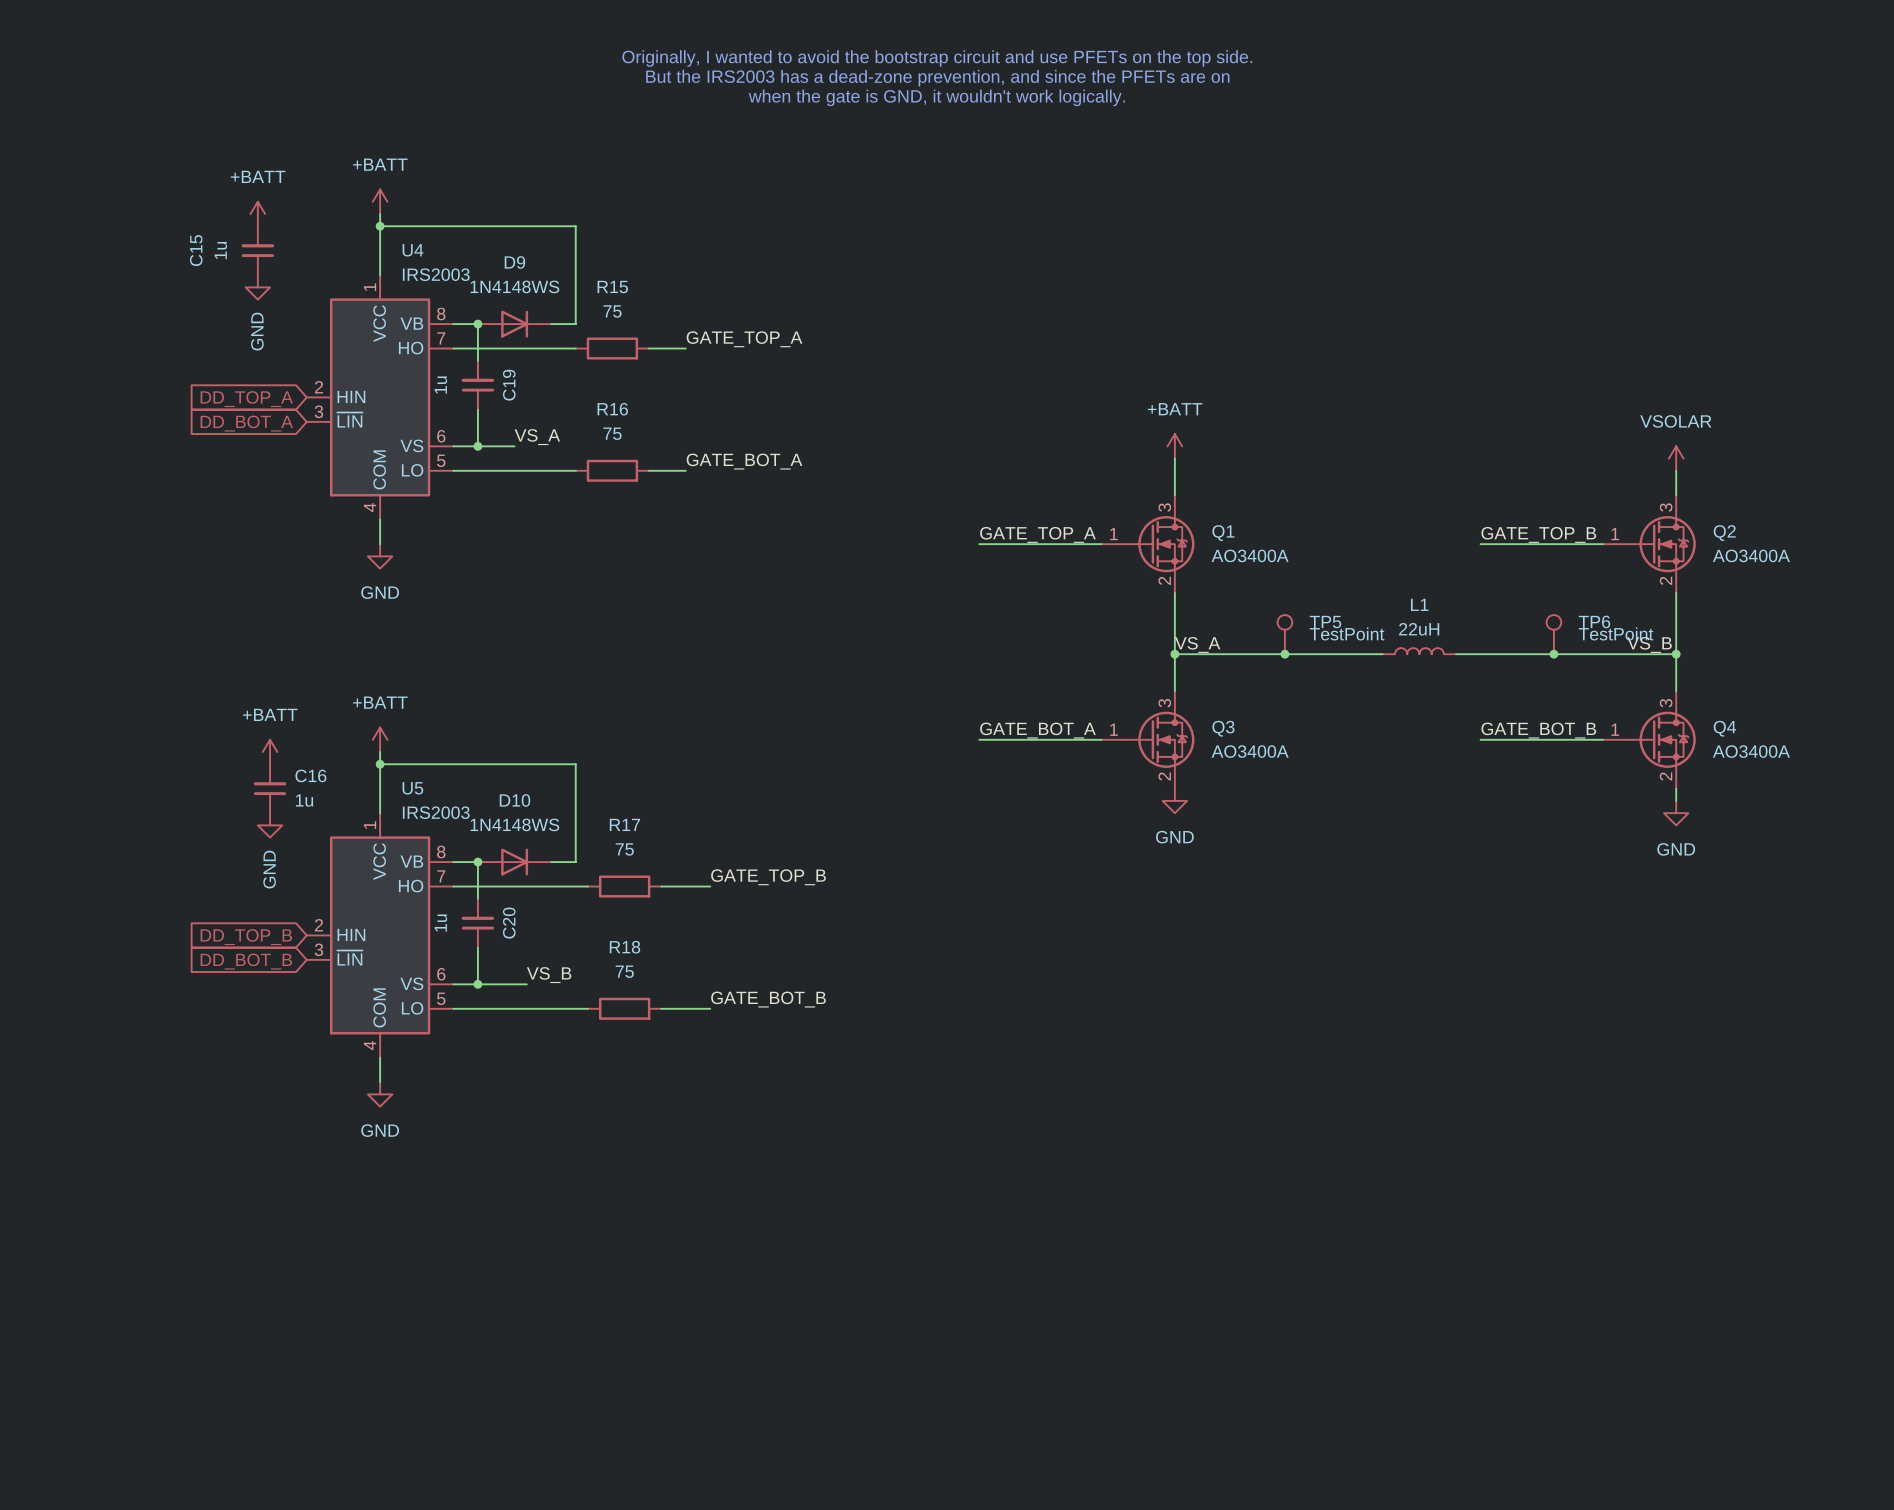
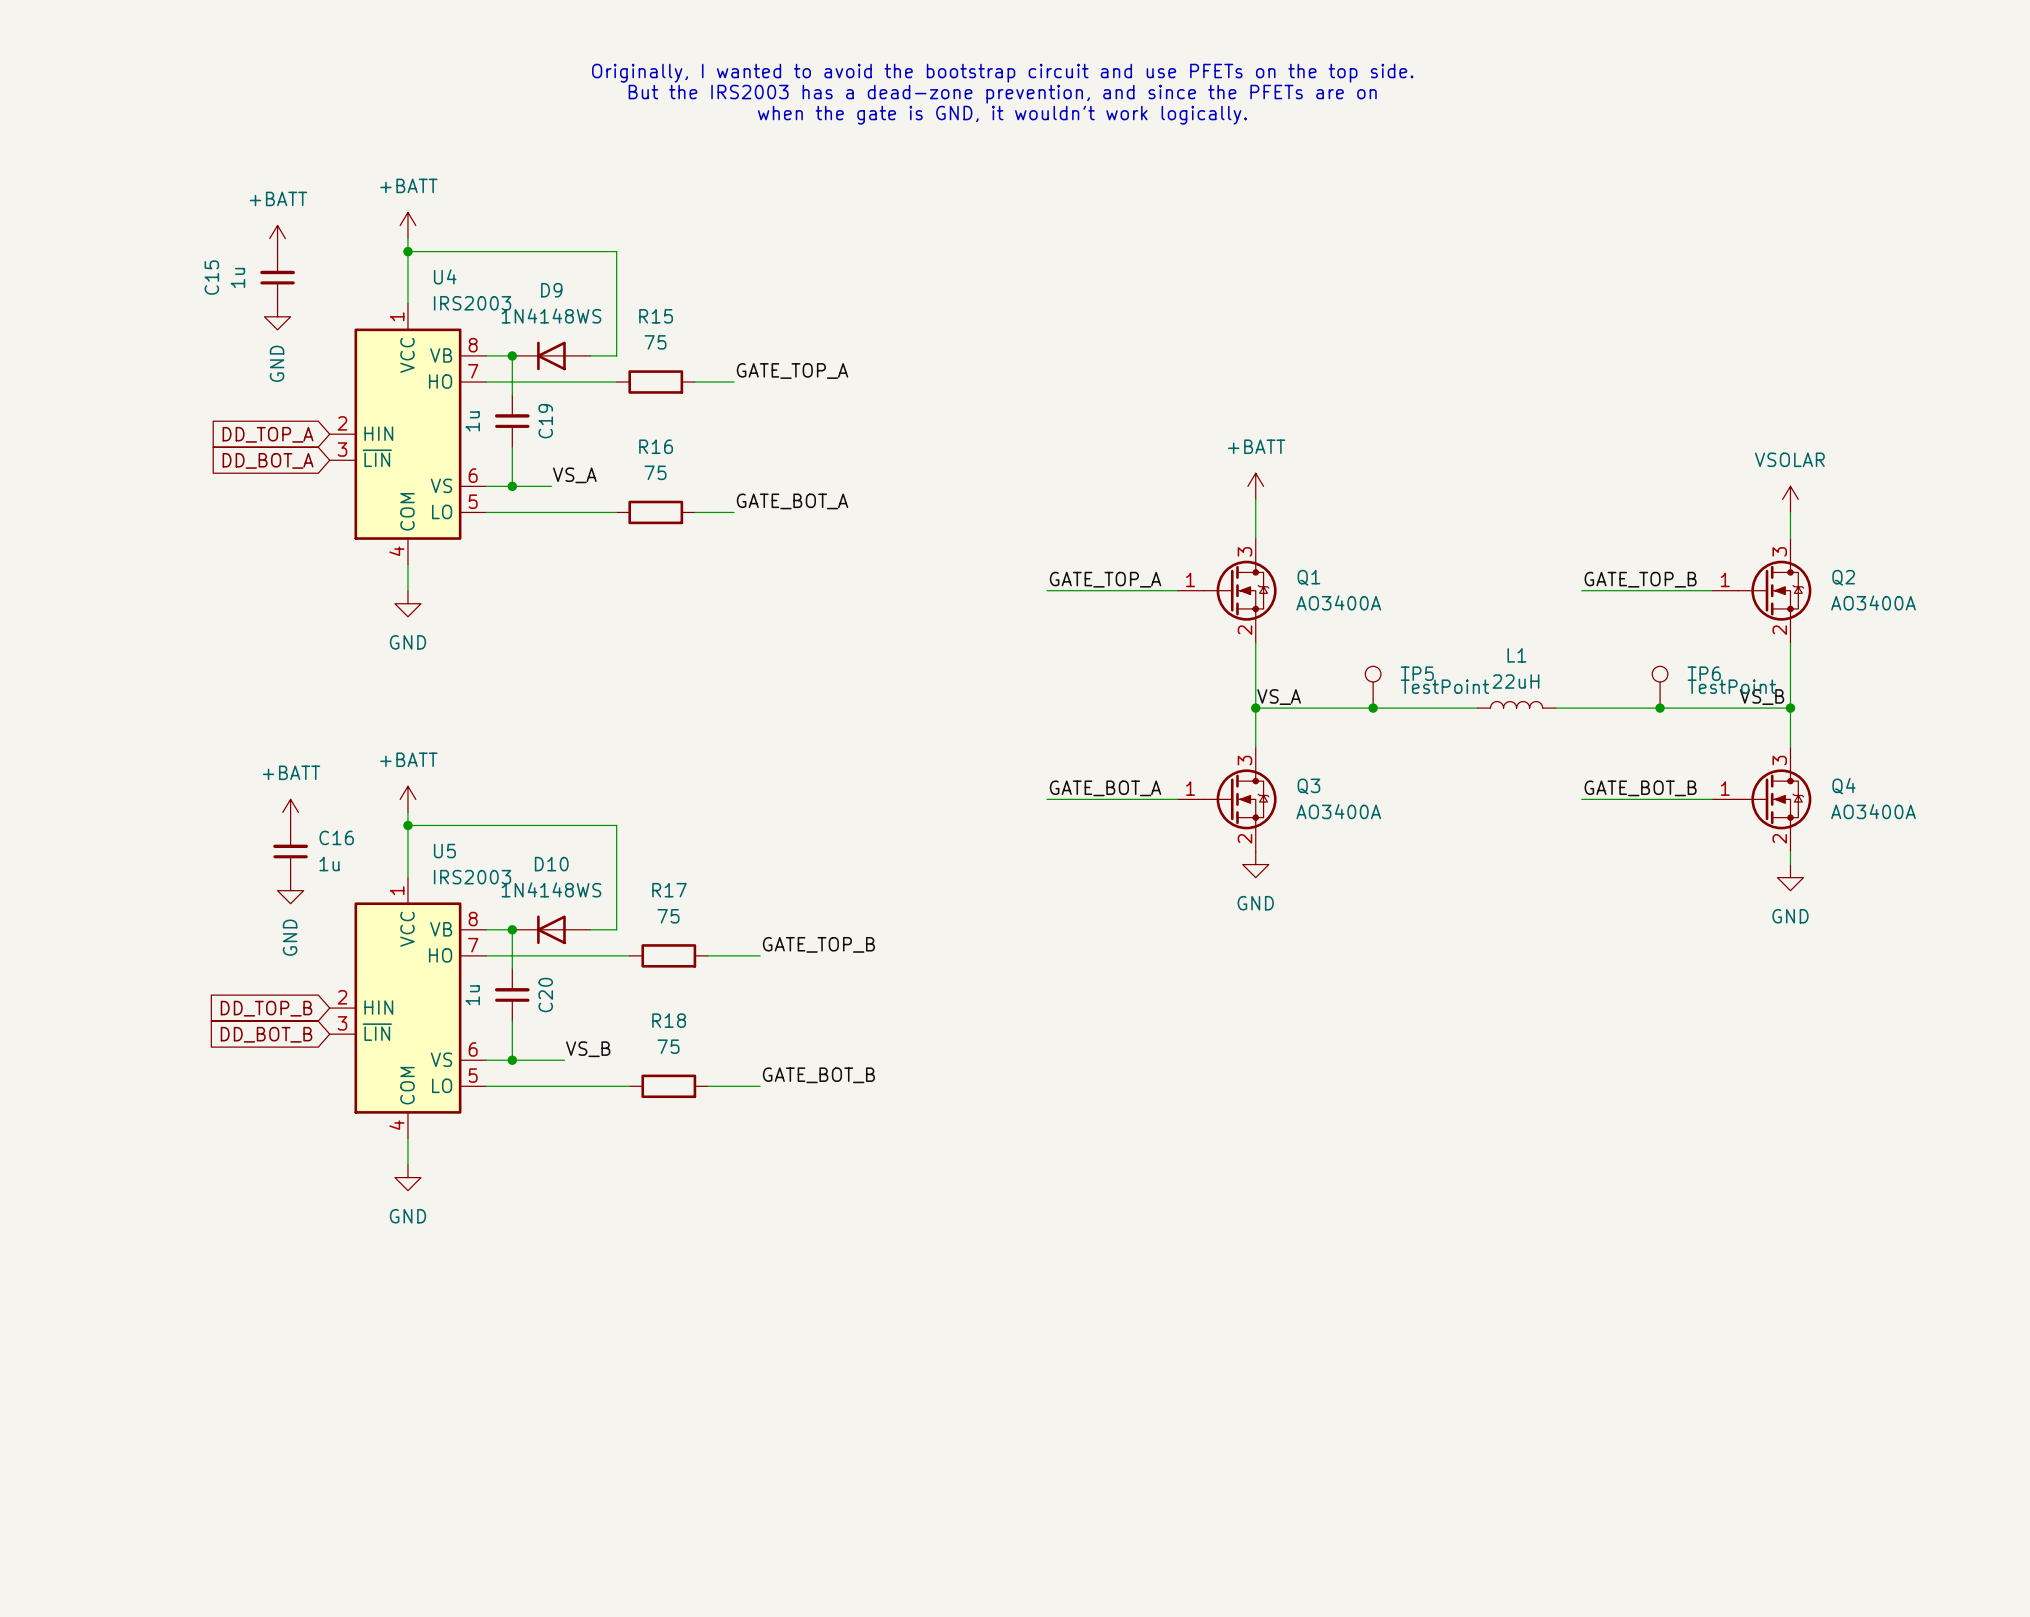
D9 rotation: 0° (514, 324) -> 180° (551, 355)
D10 rotation: 0° (514, 862) -> 180° (551, 929)

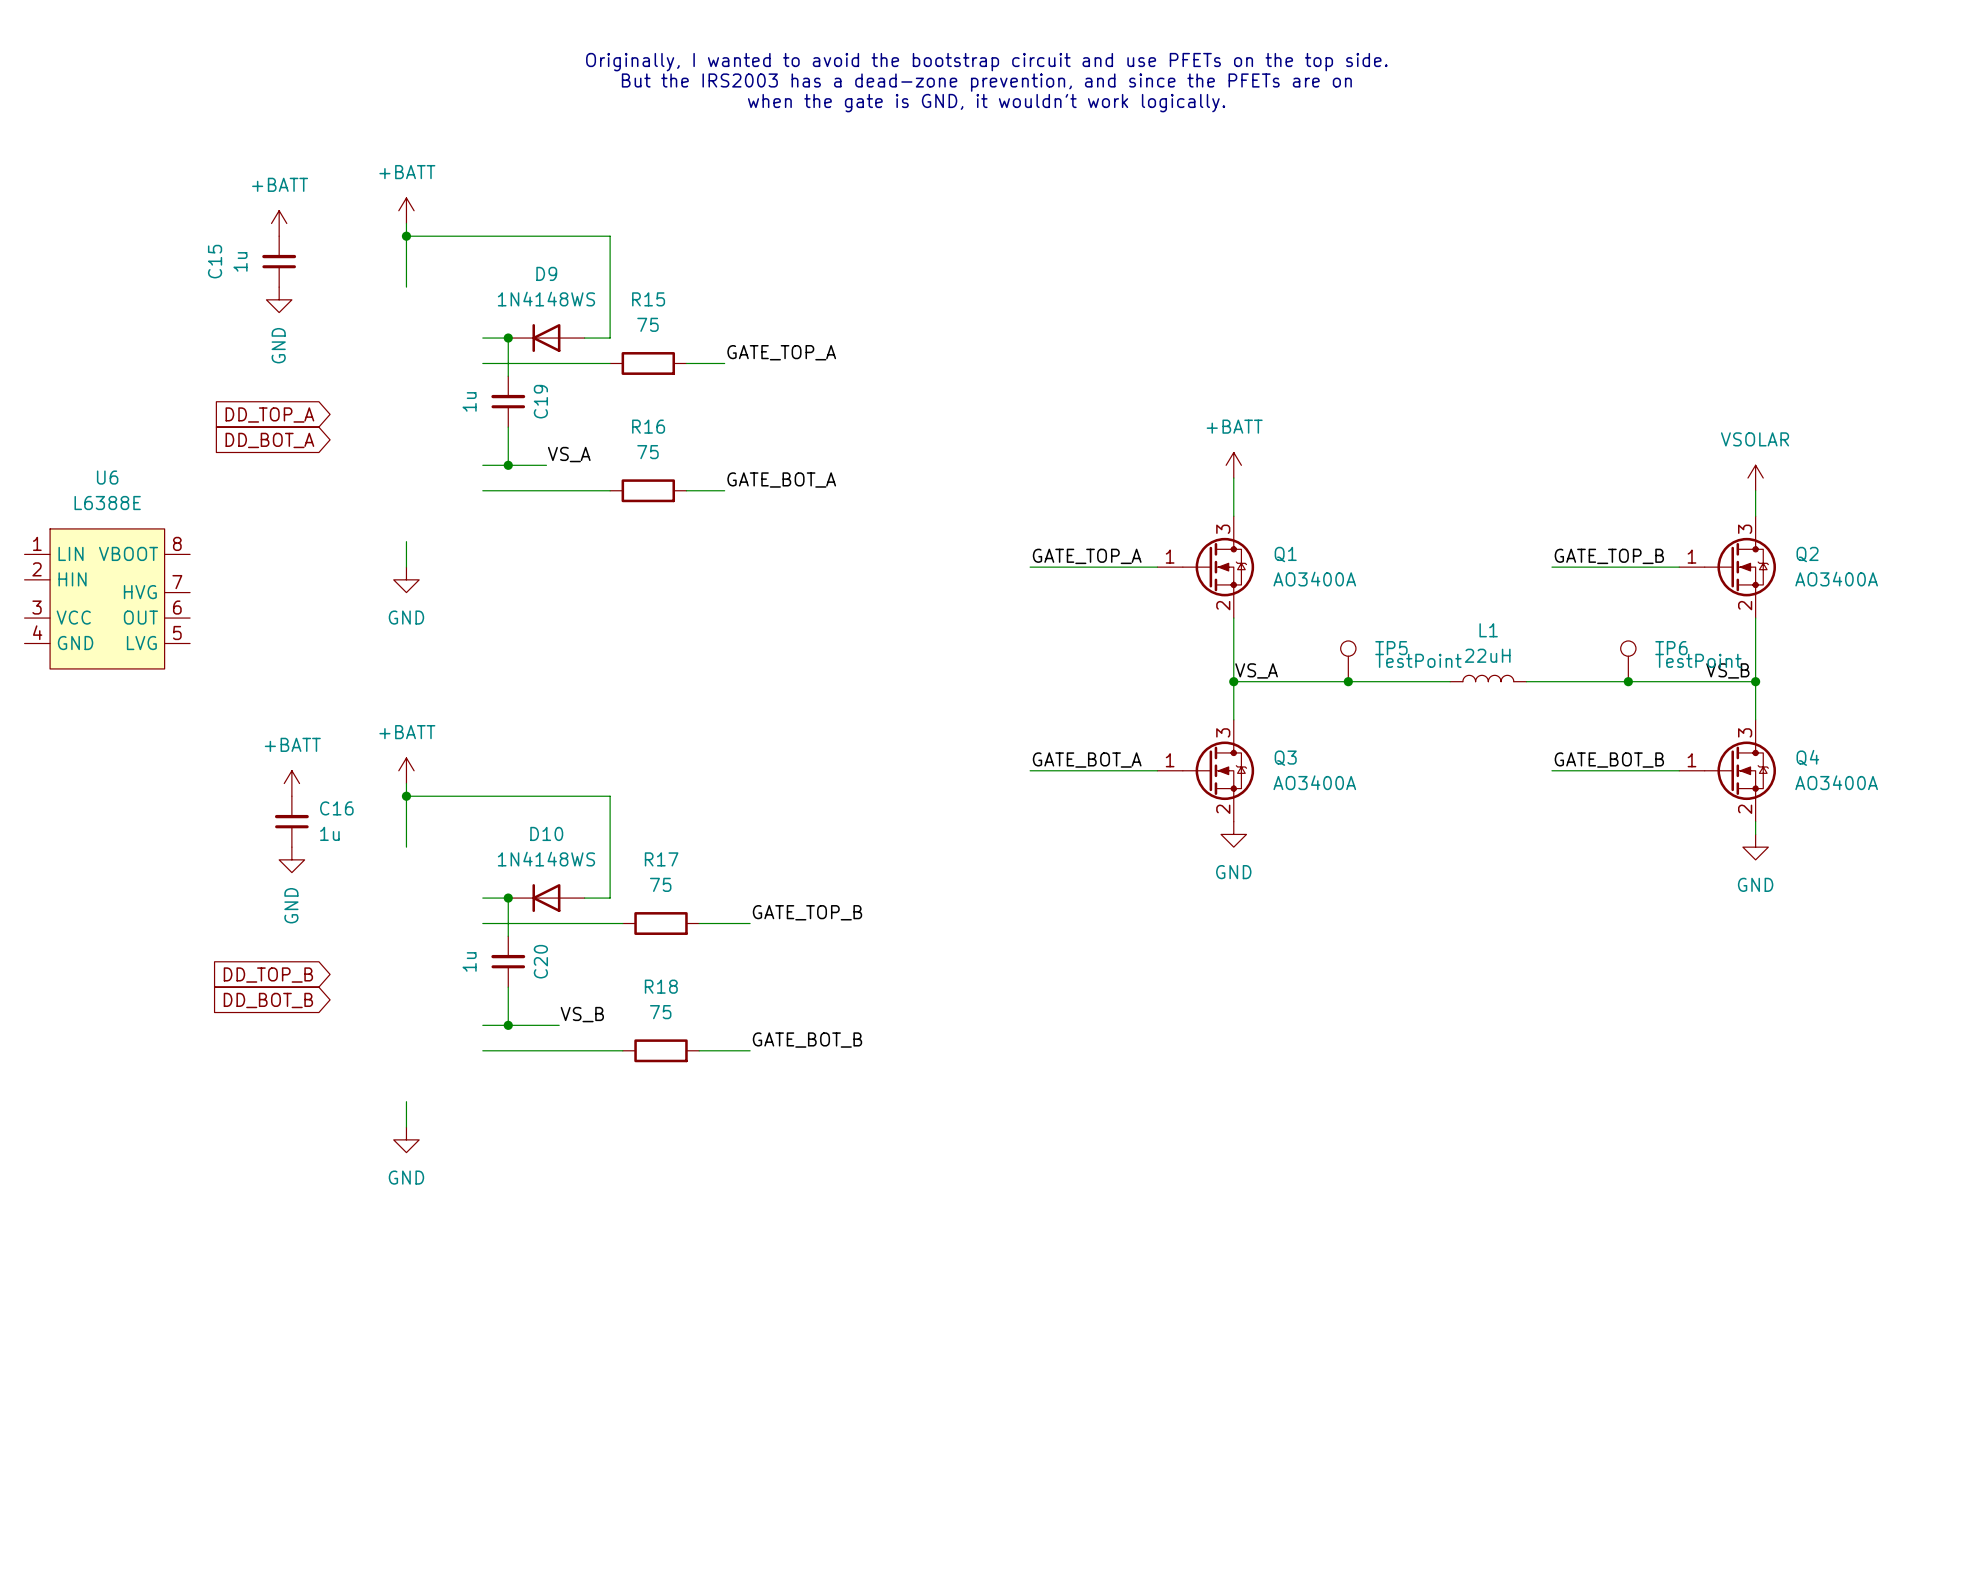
U4: IRS2003 (407, 434) -> none
U6: none -> L6388E (107, 598)
U5: IRS2003 (407, 1008) -> none

